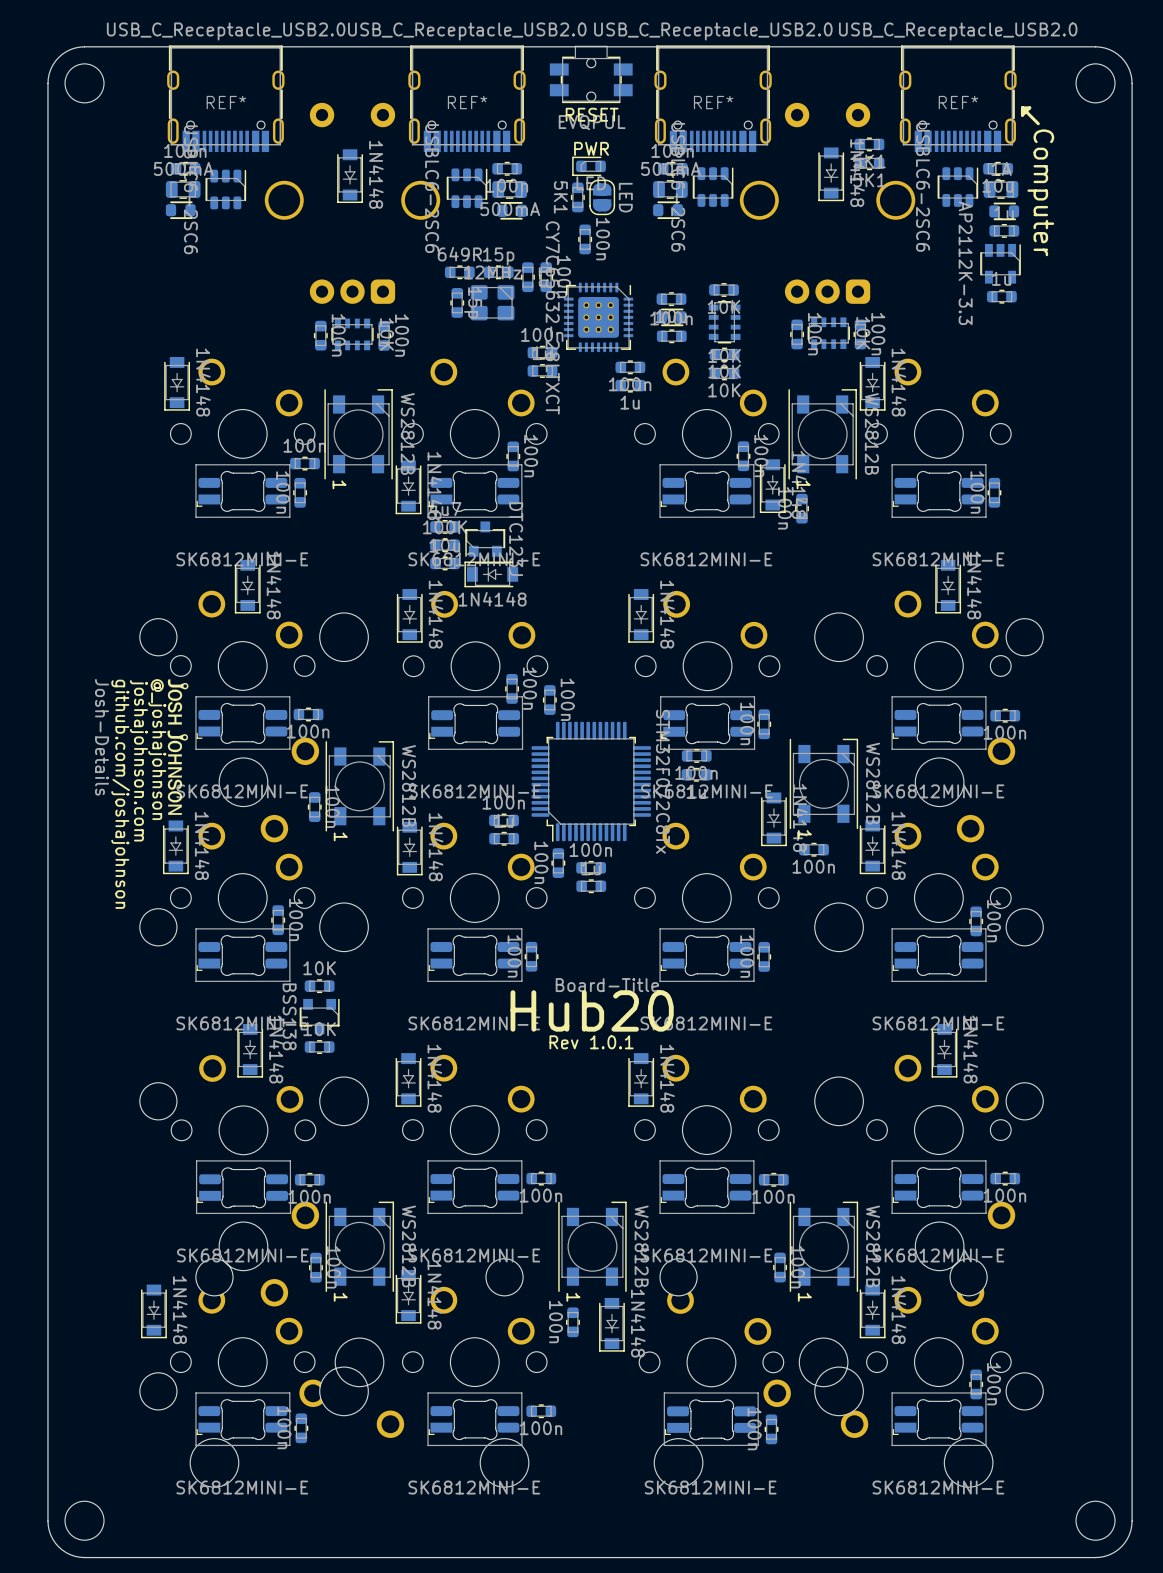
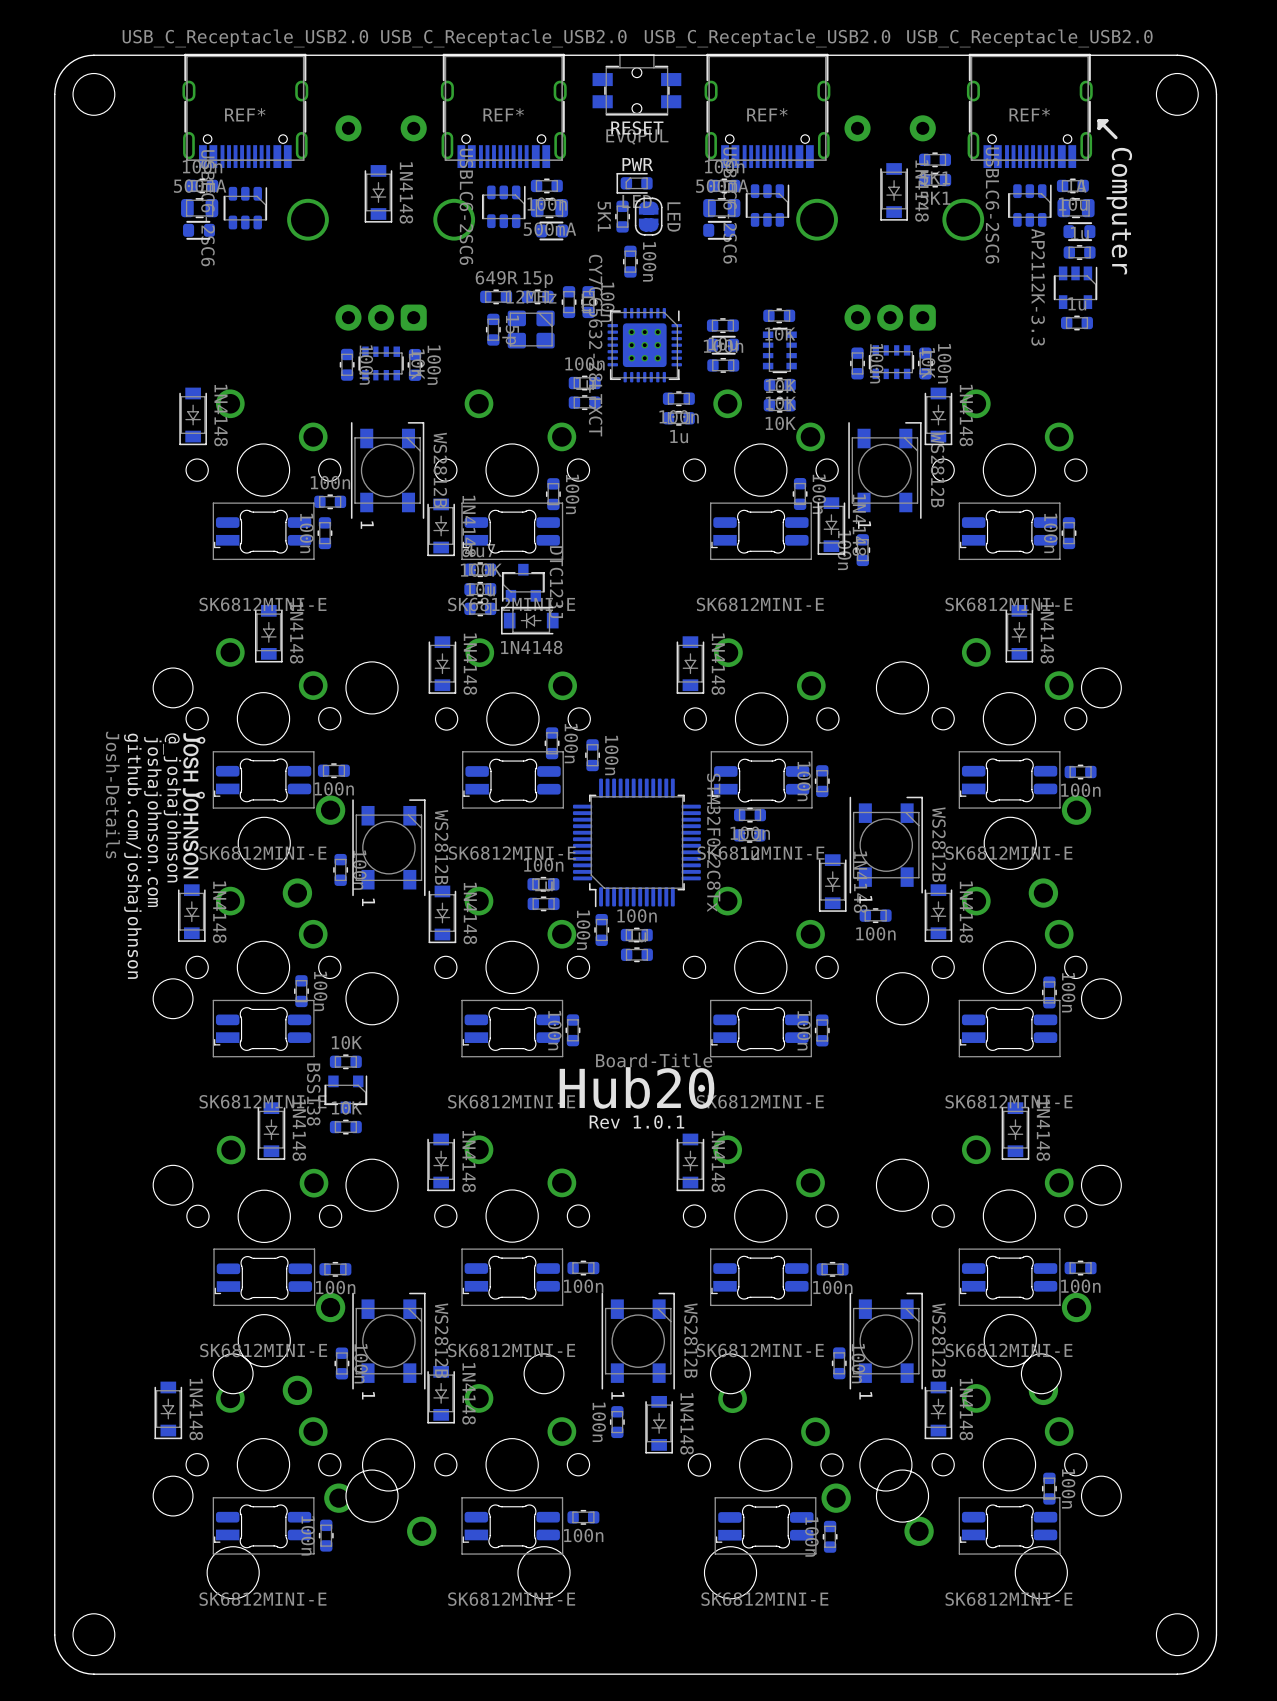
part rotation: 0° (180, 210) -> 180° (198, 230)

